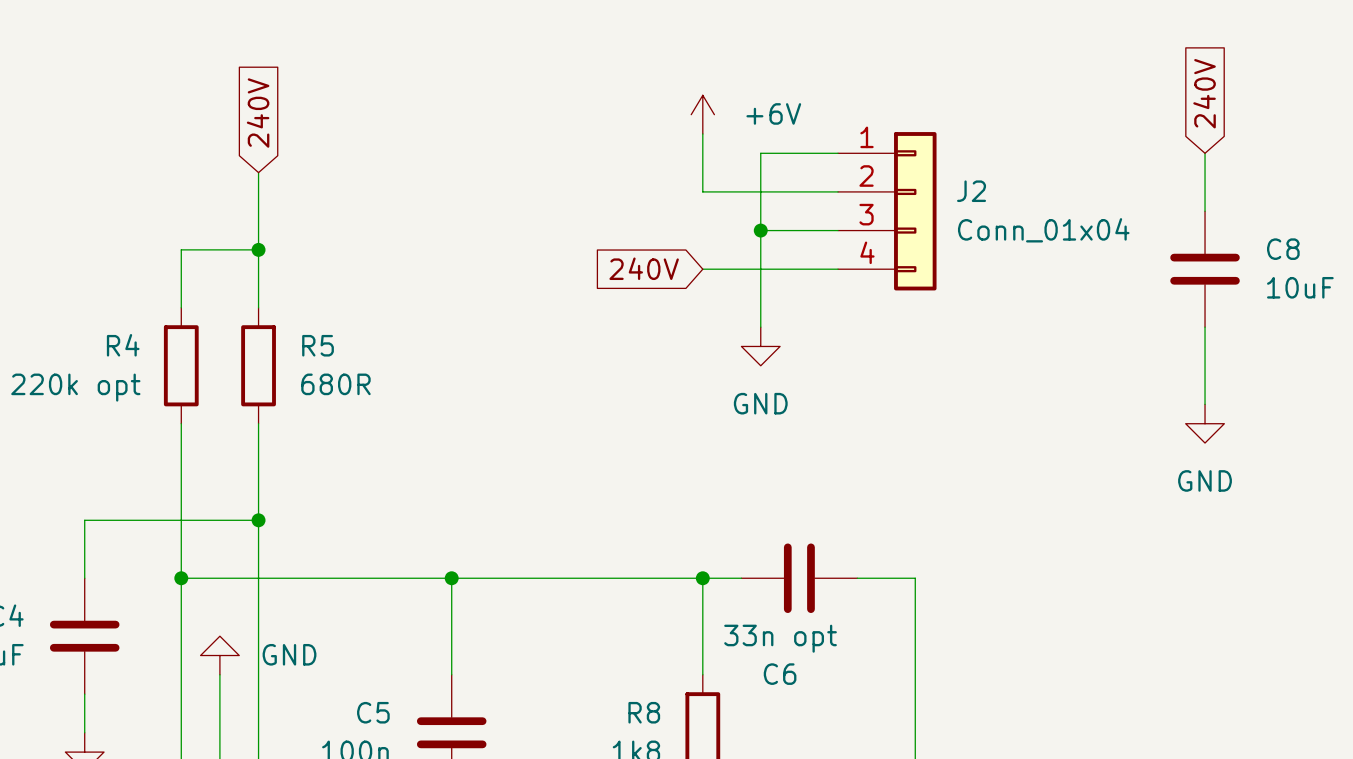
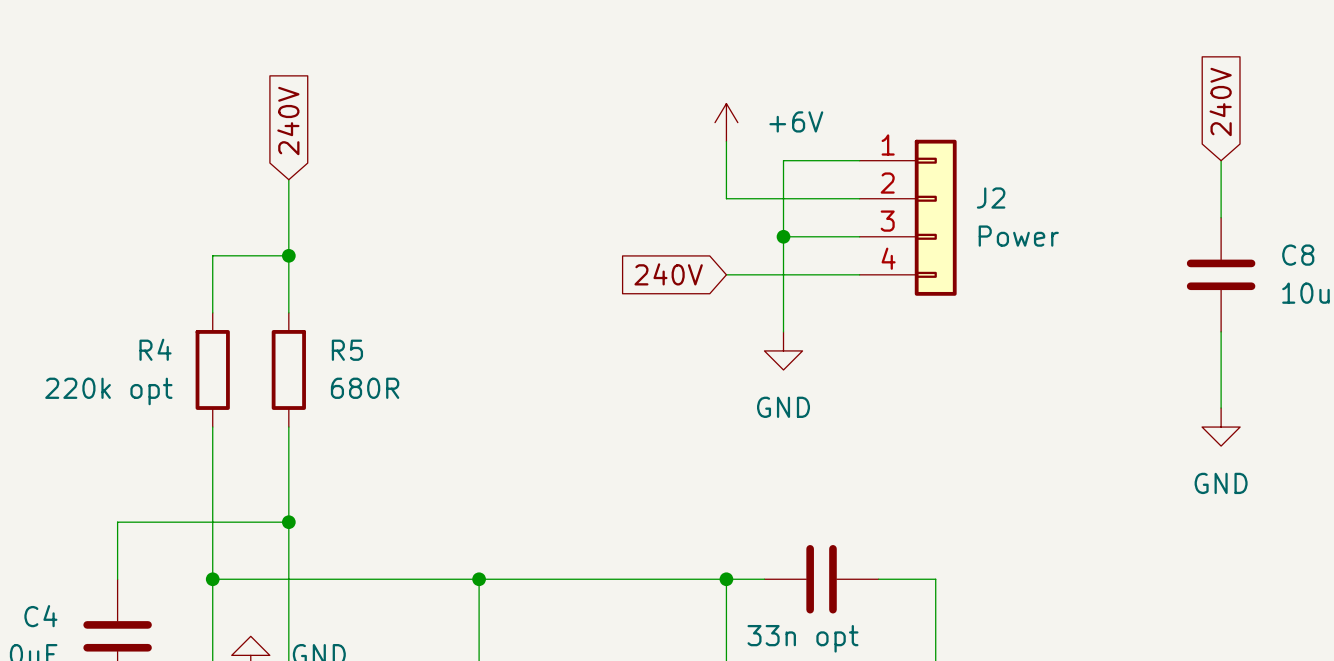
J2 value: Conn_01x04 (1043, 230) -> Power (1018, 236)

